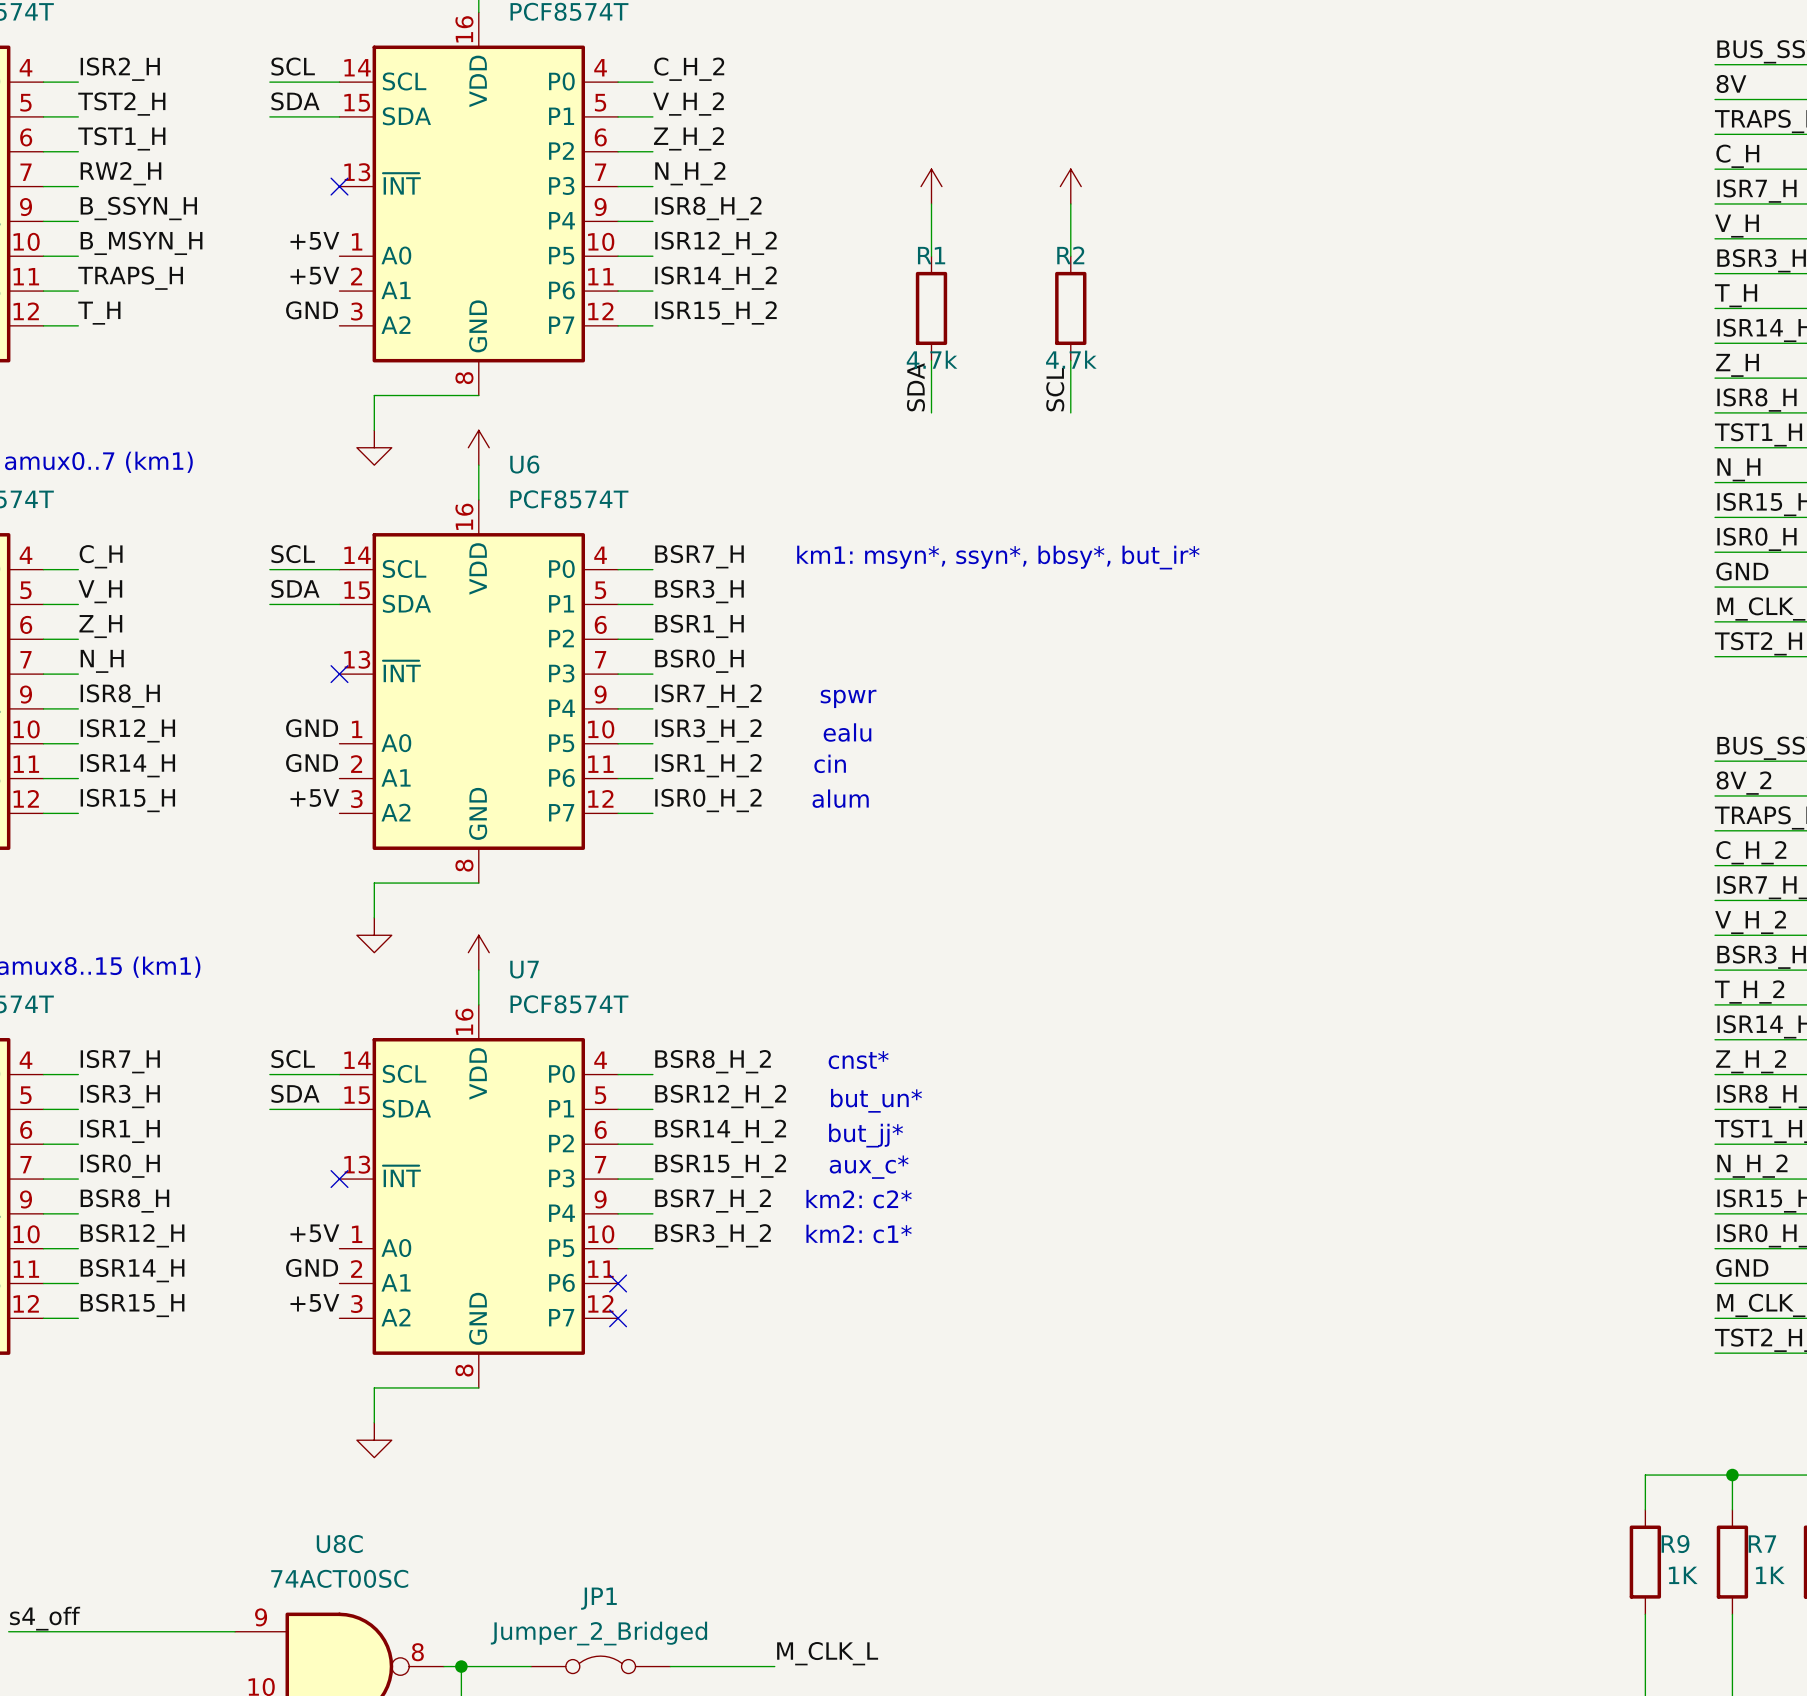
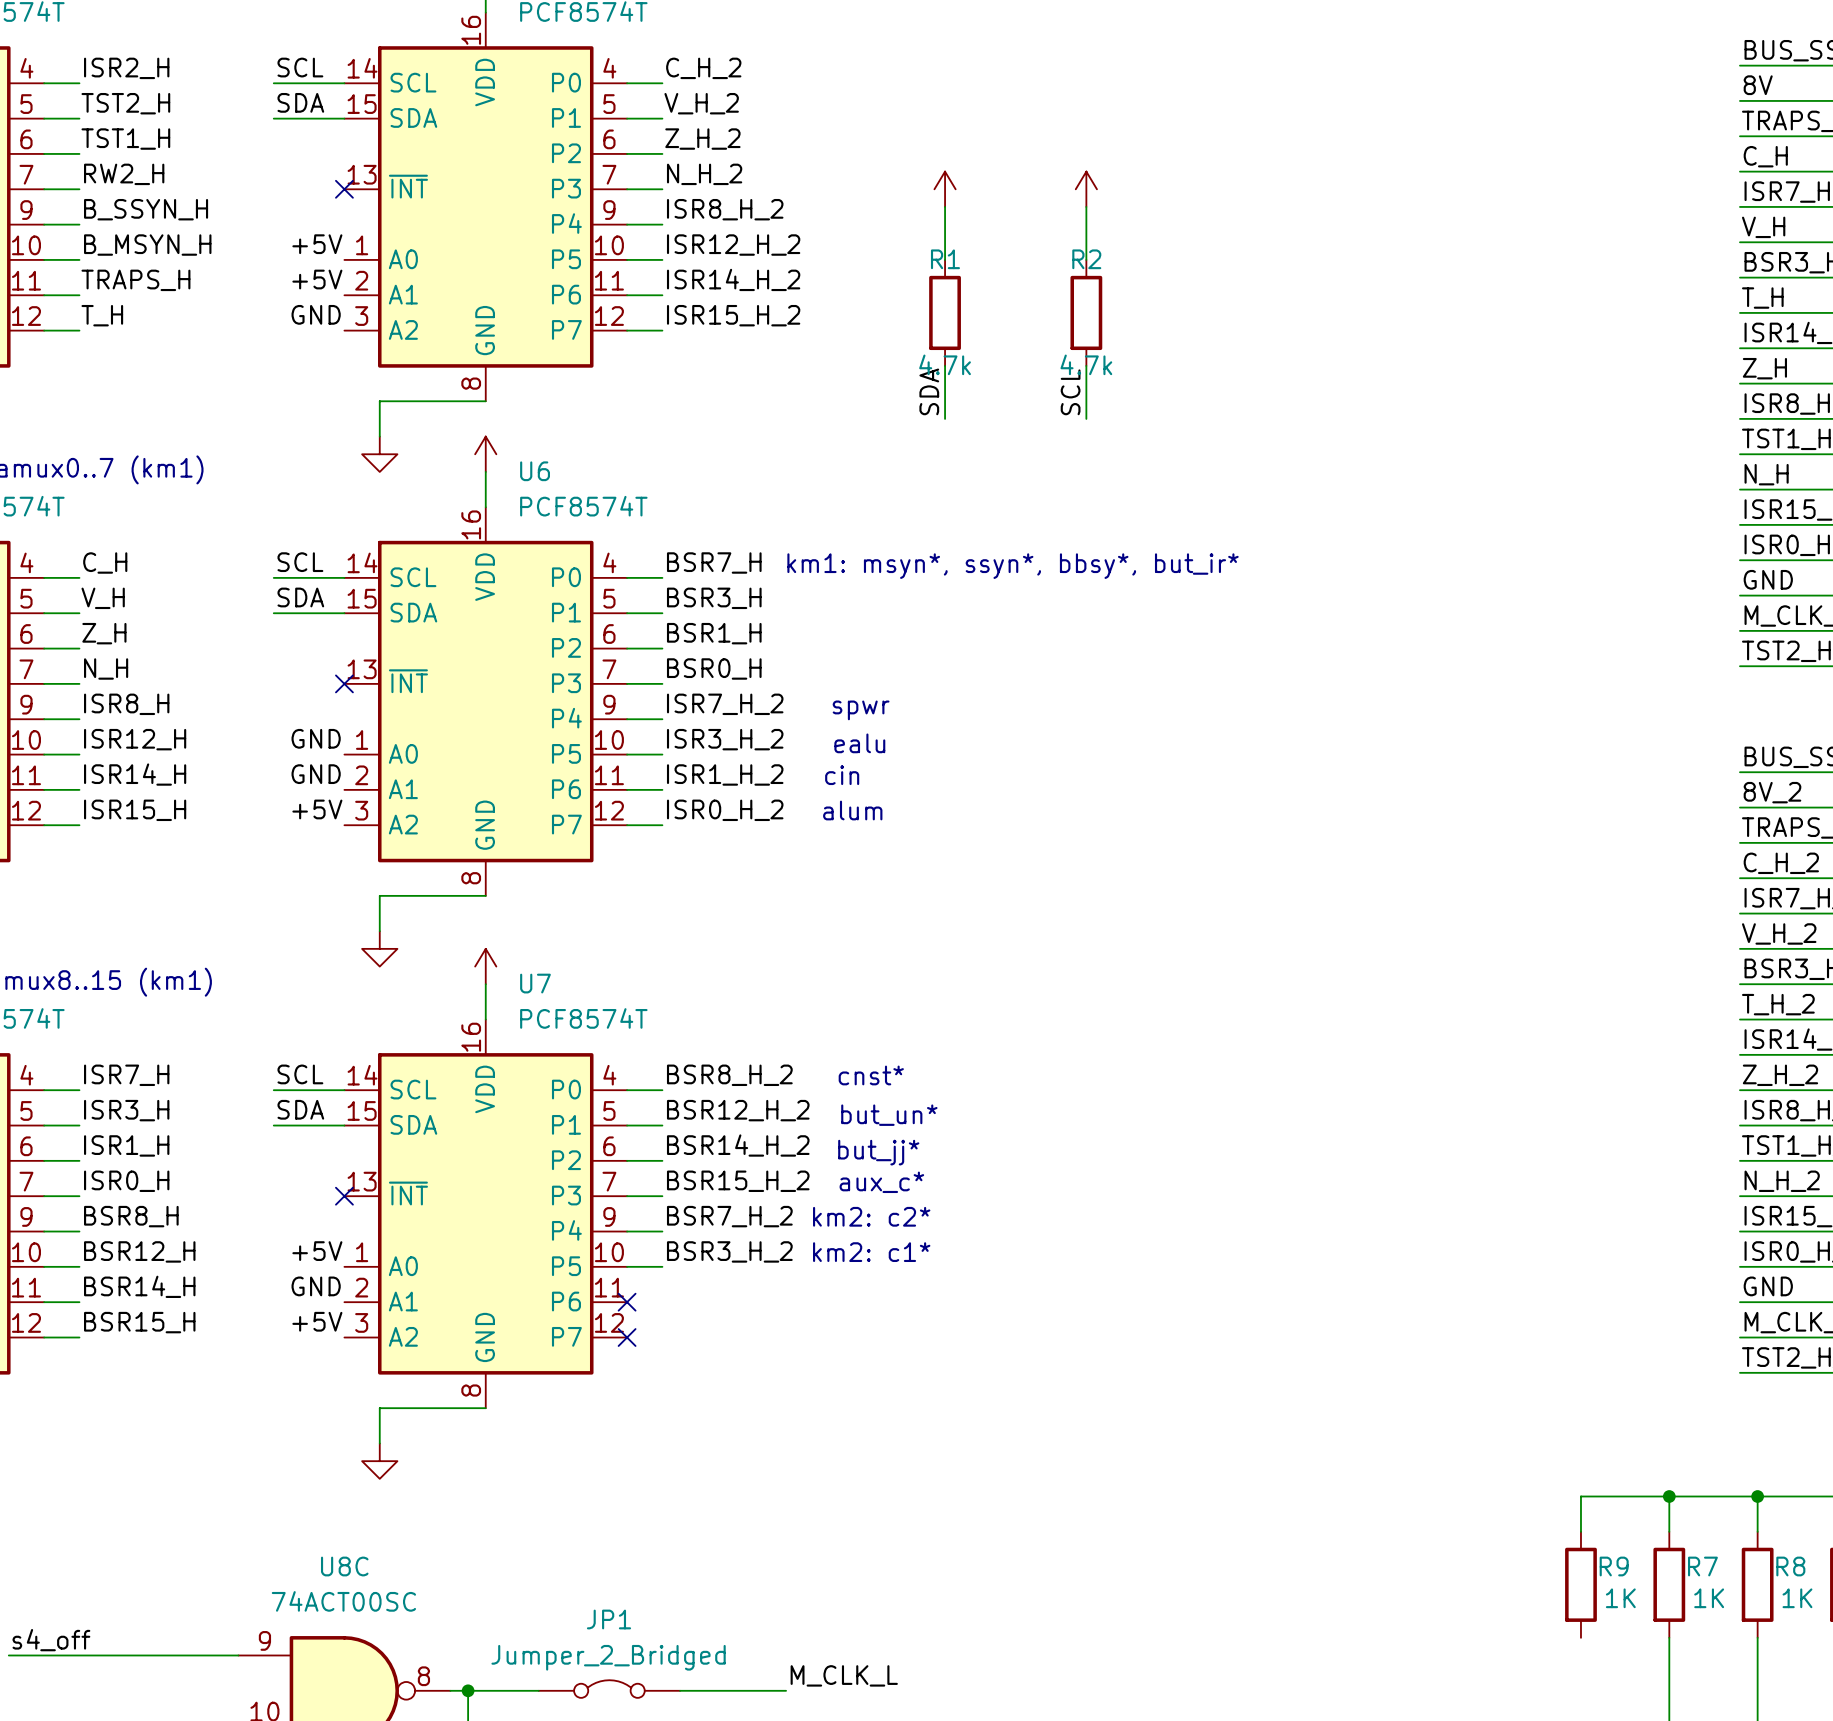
wire: none -> (1669, 1496) (1580, 1496) (1580, 1531)
junction: none -> (1669, 1496)
R9 name: R9 (1675, 1544) -> R7 (1702, 1566)
R7 name: R7 (1762, 1544) -> R8 (1790, 1566)
R9: none -> 1K (1580, 1584)

